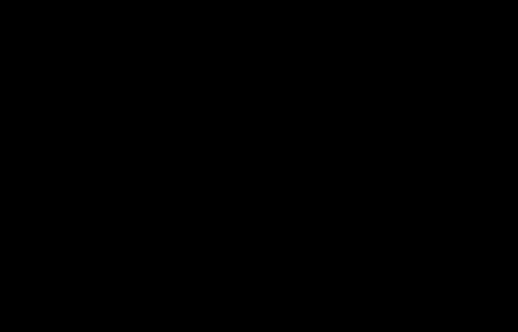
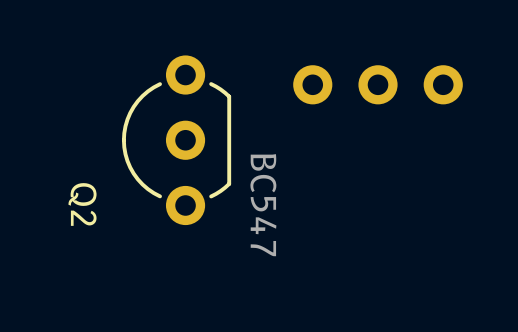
part: none -> (378, 84)
Q2: none -> BC547 (176, 140)

